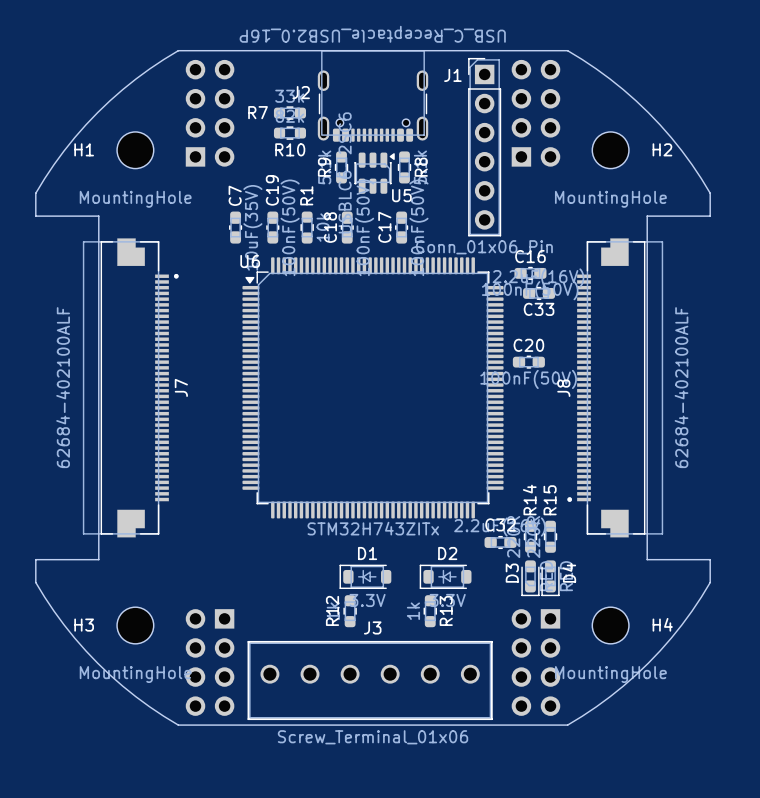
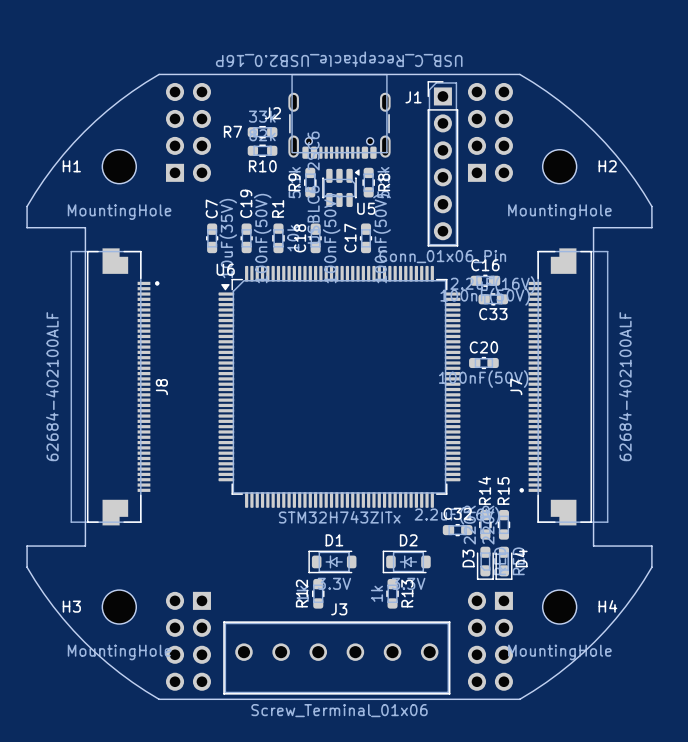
J7 name: J7 (181, 387) -> J8 (161, 387)
J8 name: J8 (563, 388) -> J7 (516, 386)

